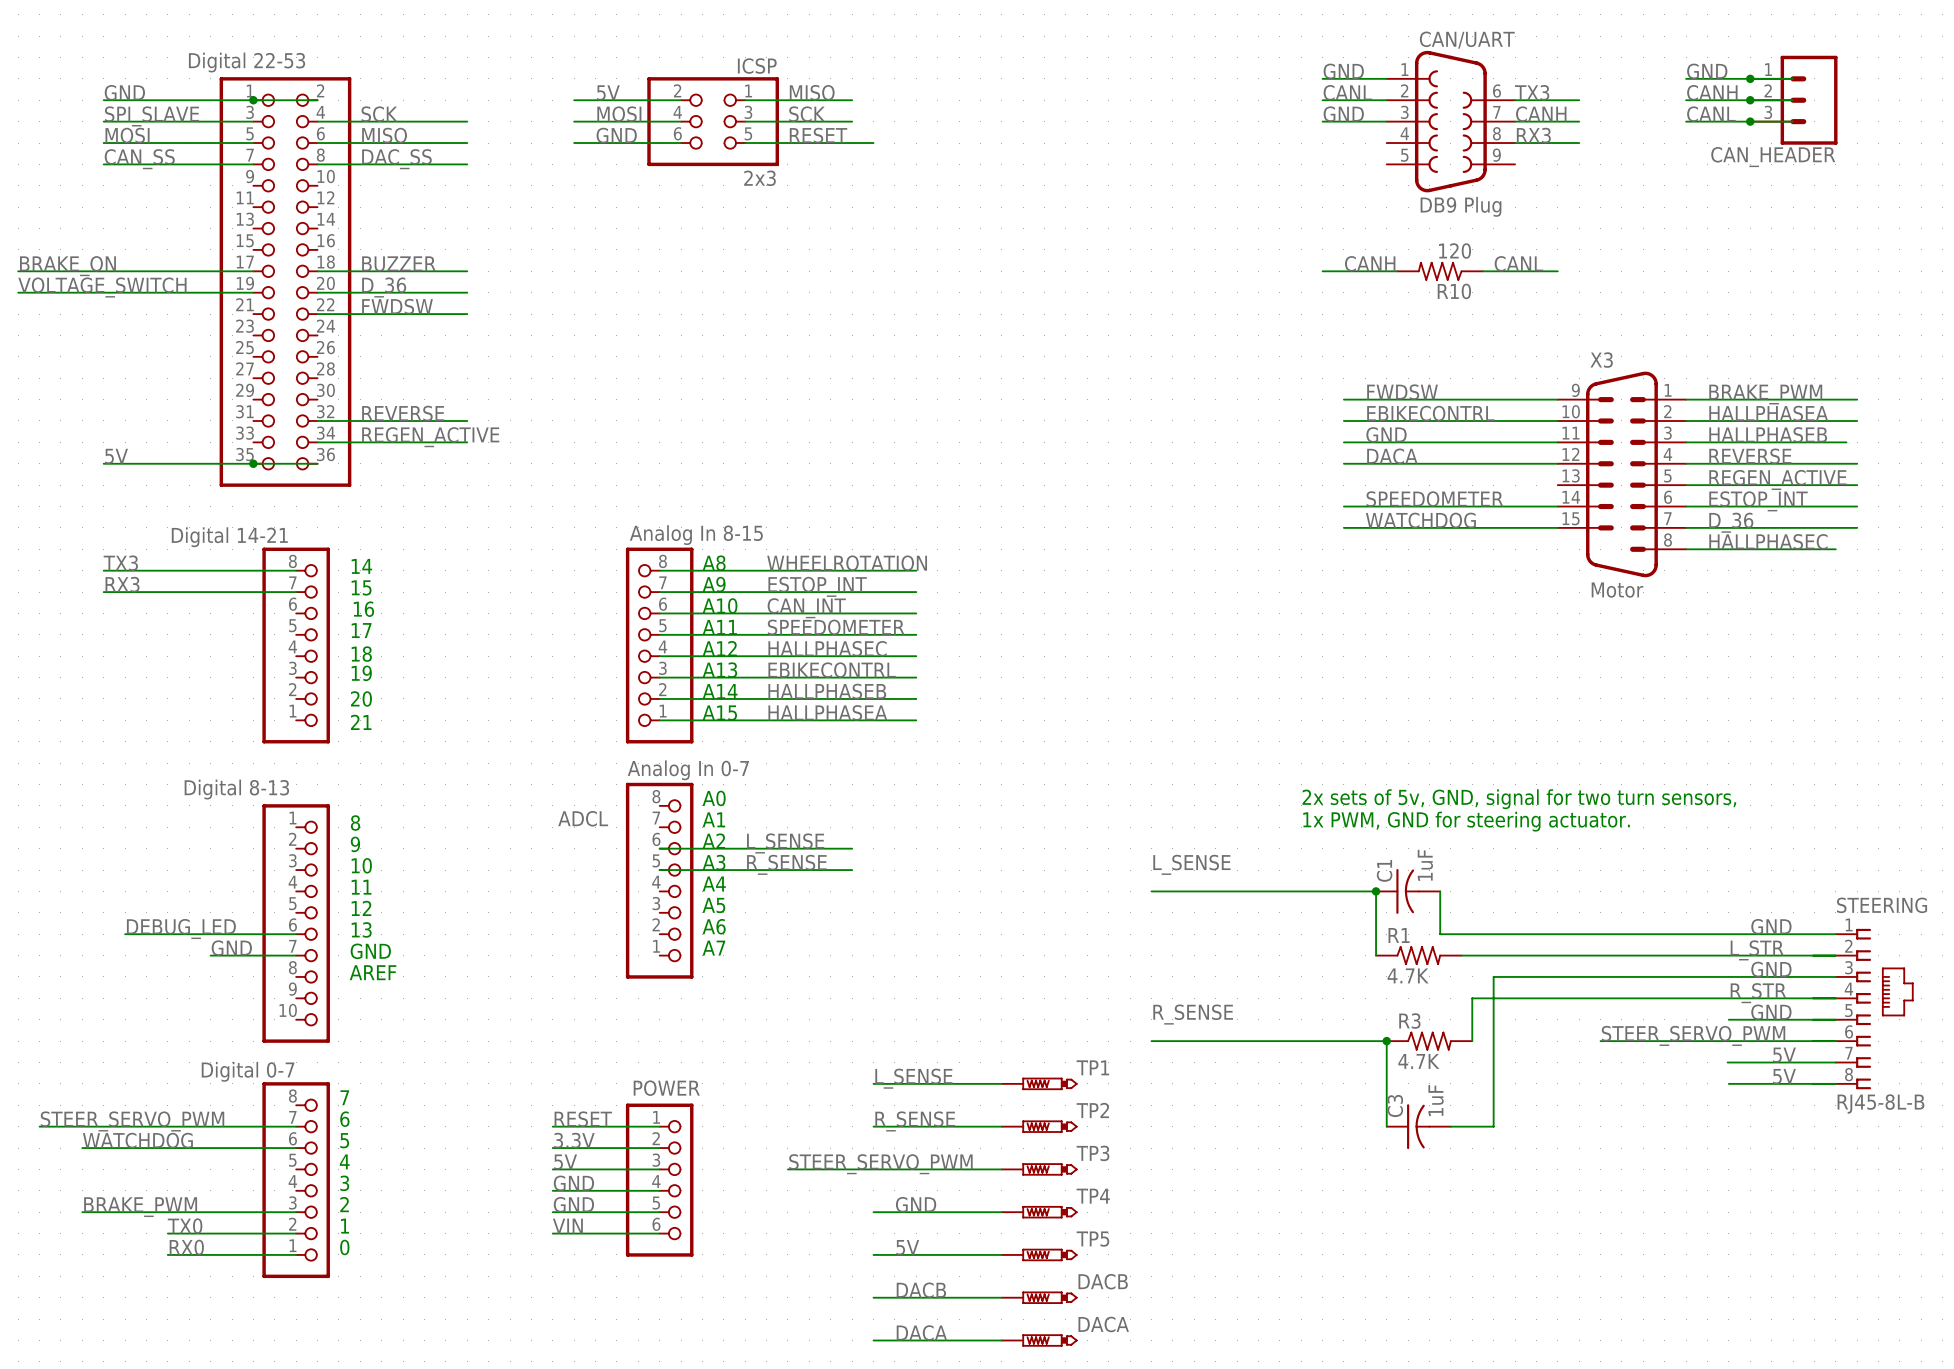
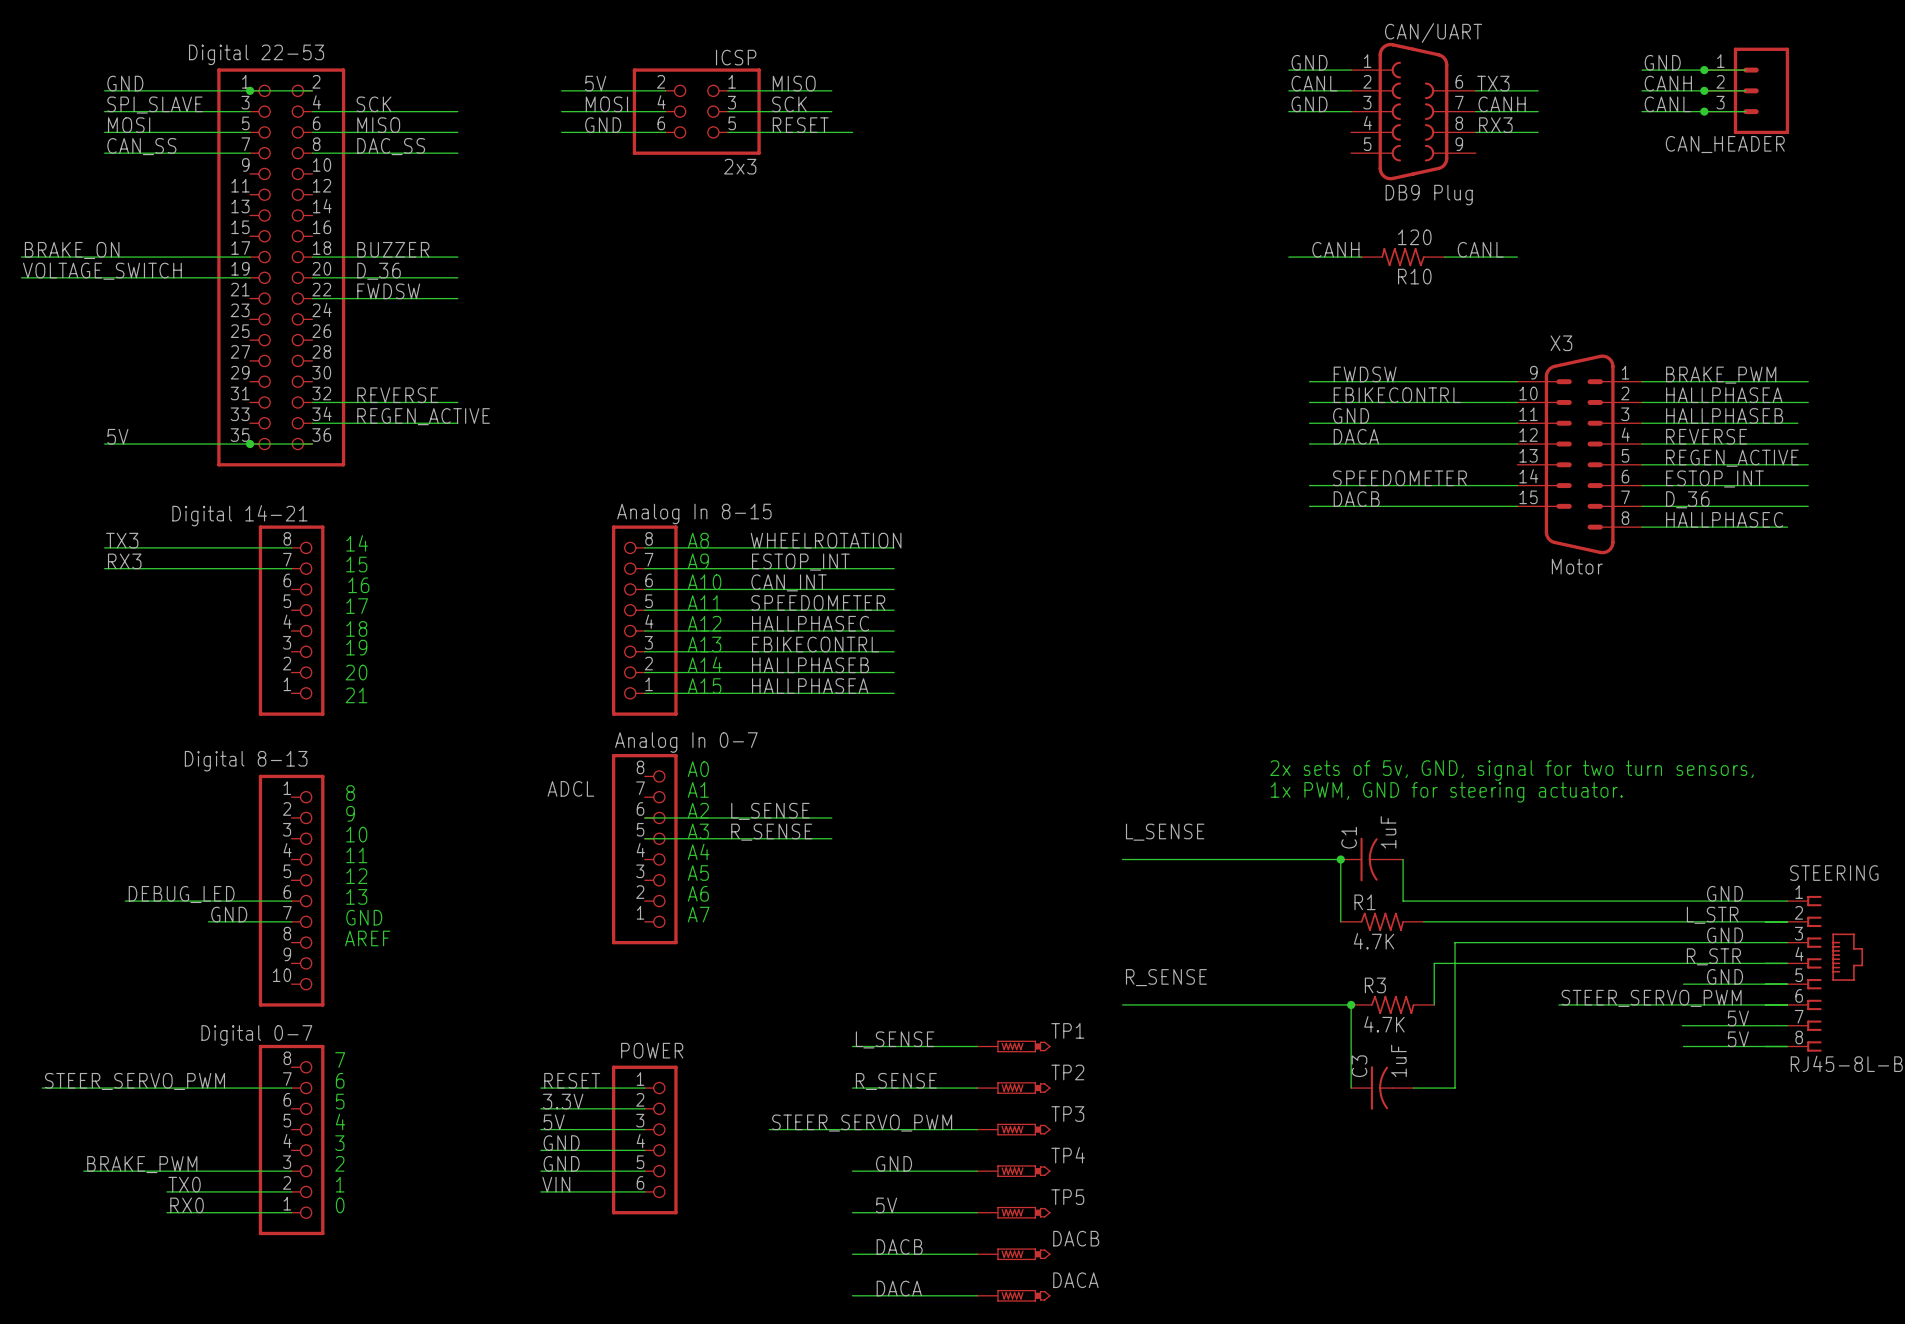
label: WATCHDOG (1420, 520) -> DACB (1356, 499)
label: WATCHDOG (137, 1140) -> none
wire: (82, 1148) (296, 1148) -> none

